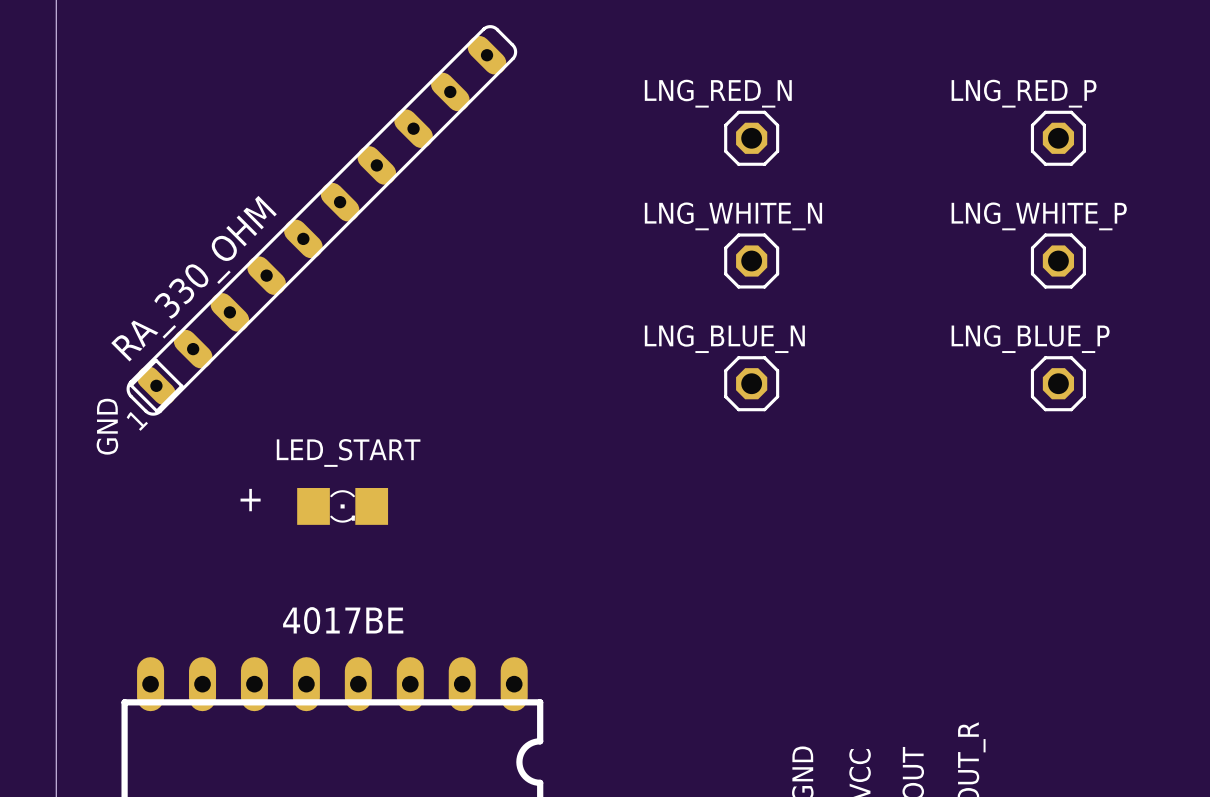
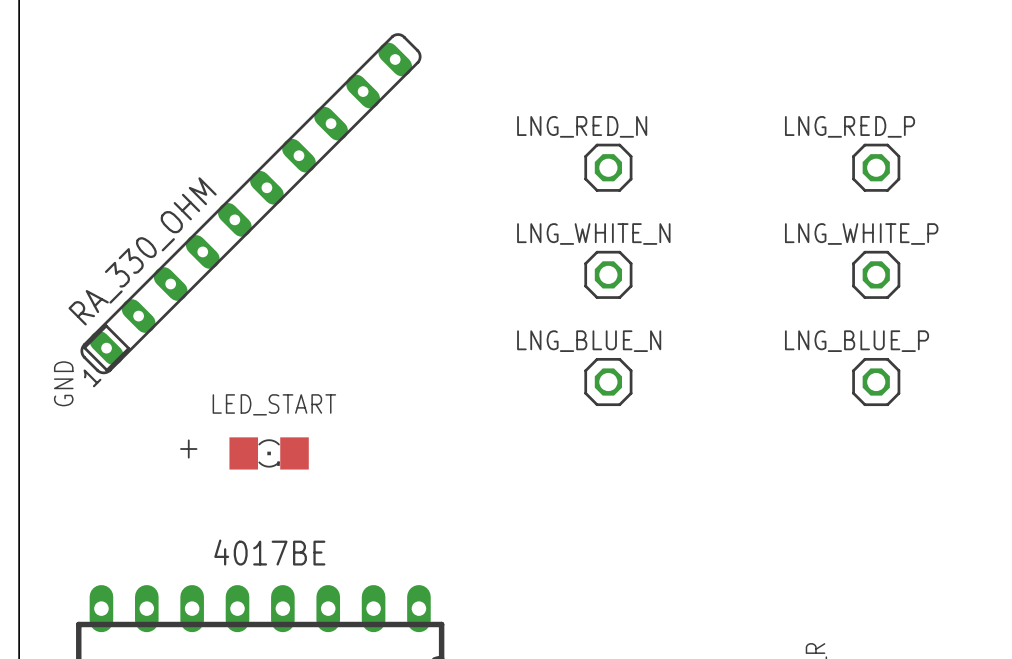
LNG_RED_N position: (751, 138) -> (608, 167)
LNG_RED_P position: (1058, 138) -> (876, 167)
LNG_WHITE_N position: (751, 261) -> (608, 274)
LNG_WHITE_P position: (1058, 261) -> (876, 274)
LNG_BLUE_N position: (751, 383) -> (608, 382)
LNG_BLUE_P position: (1058, 383) -> (876, 382)

